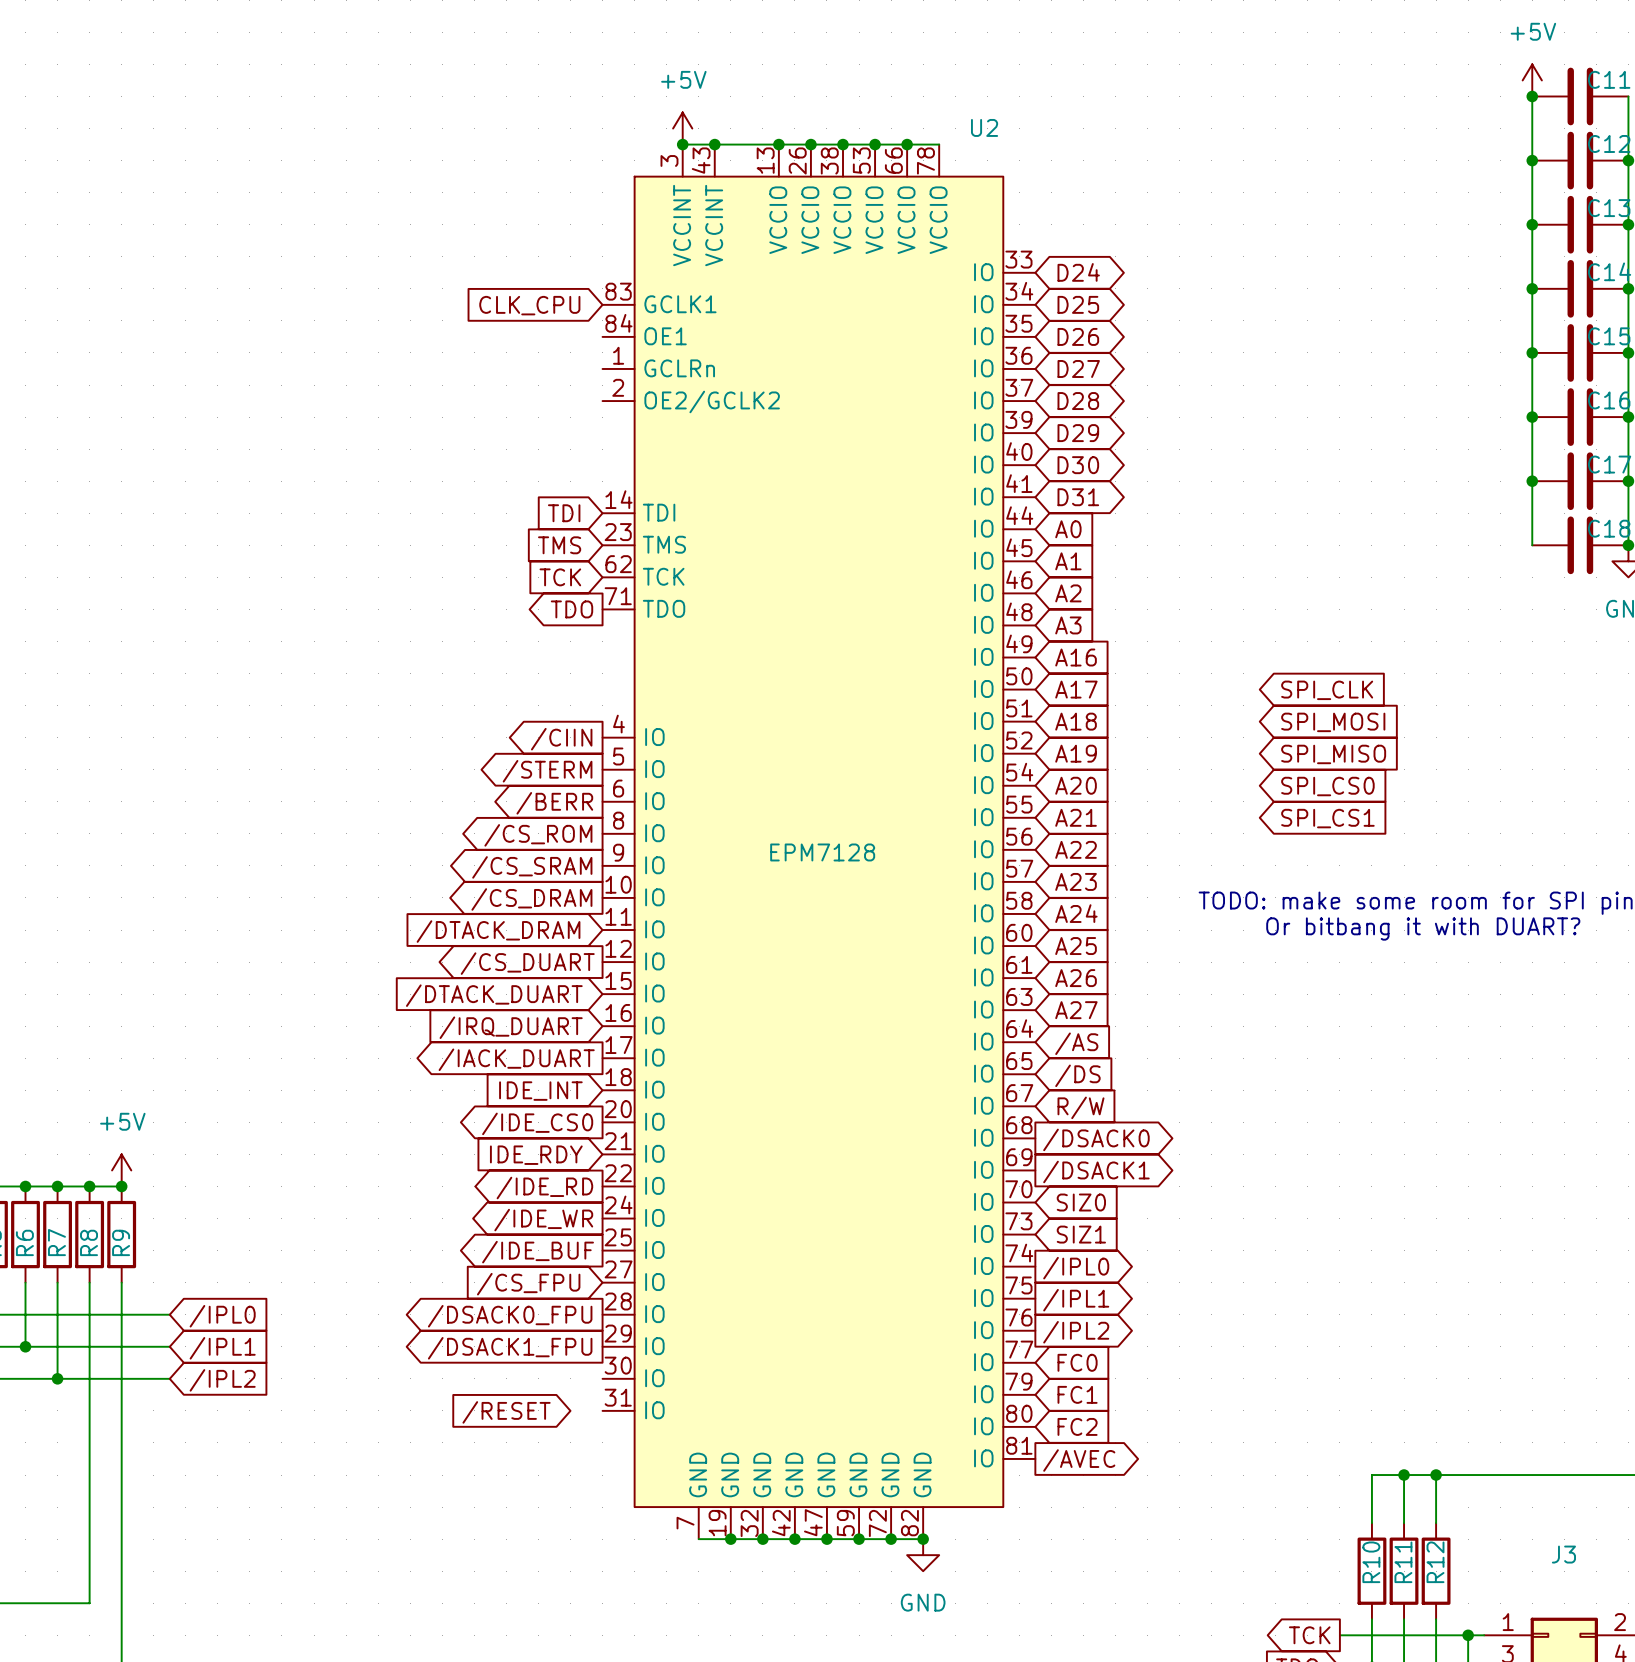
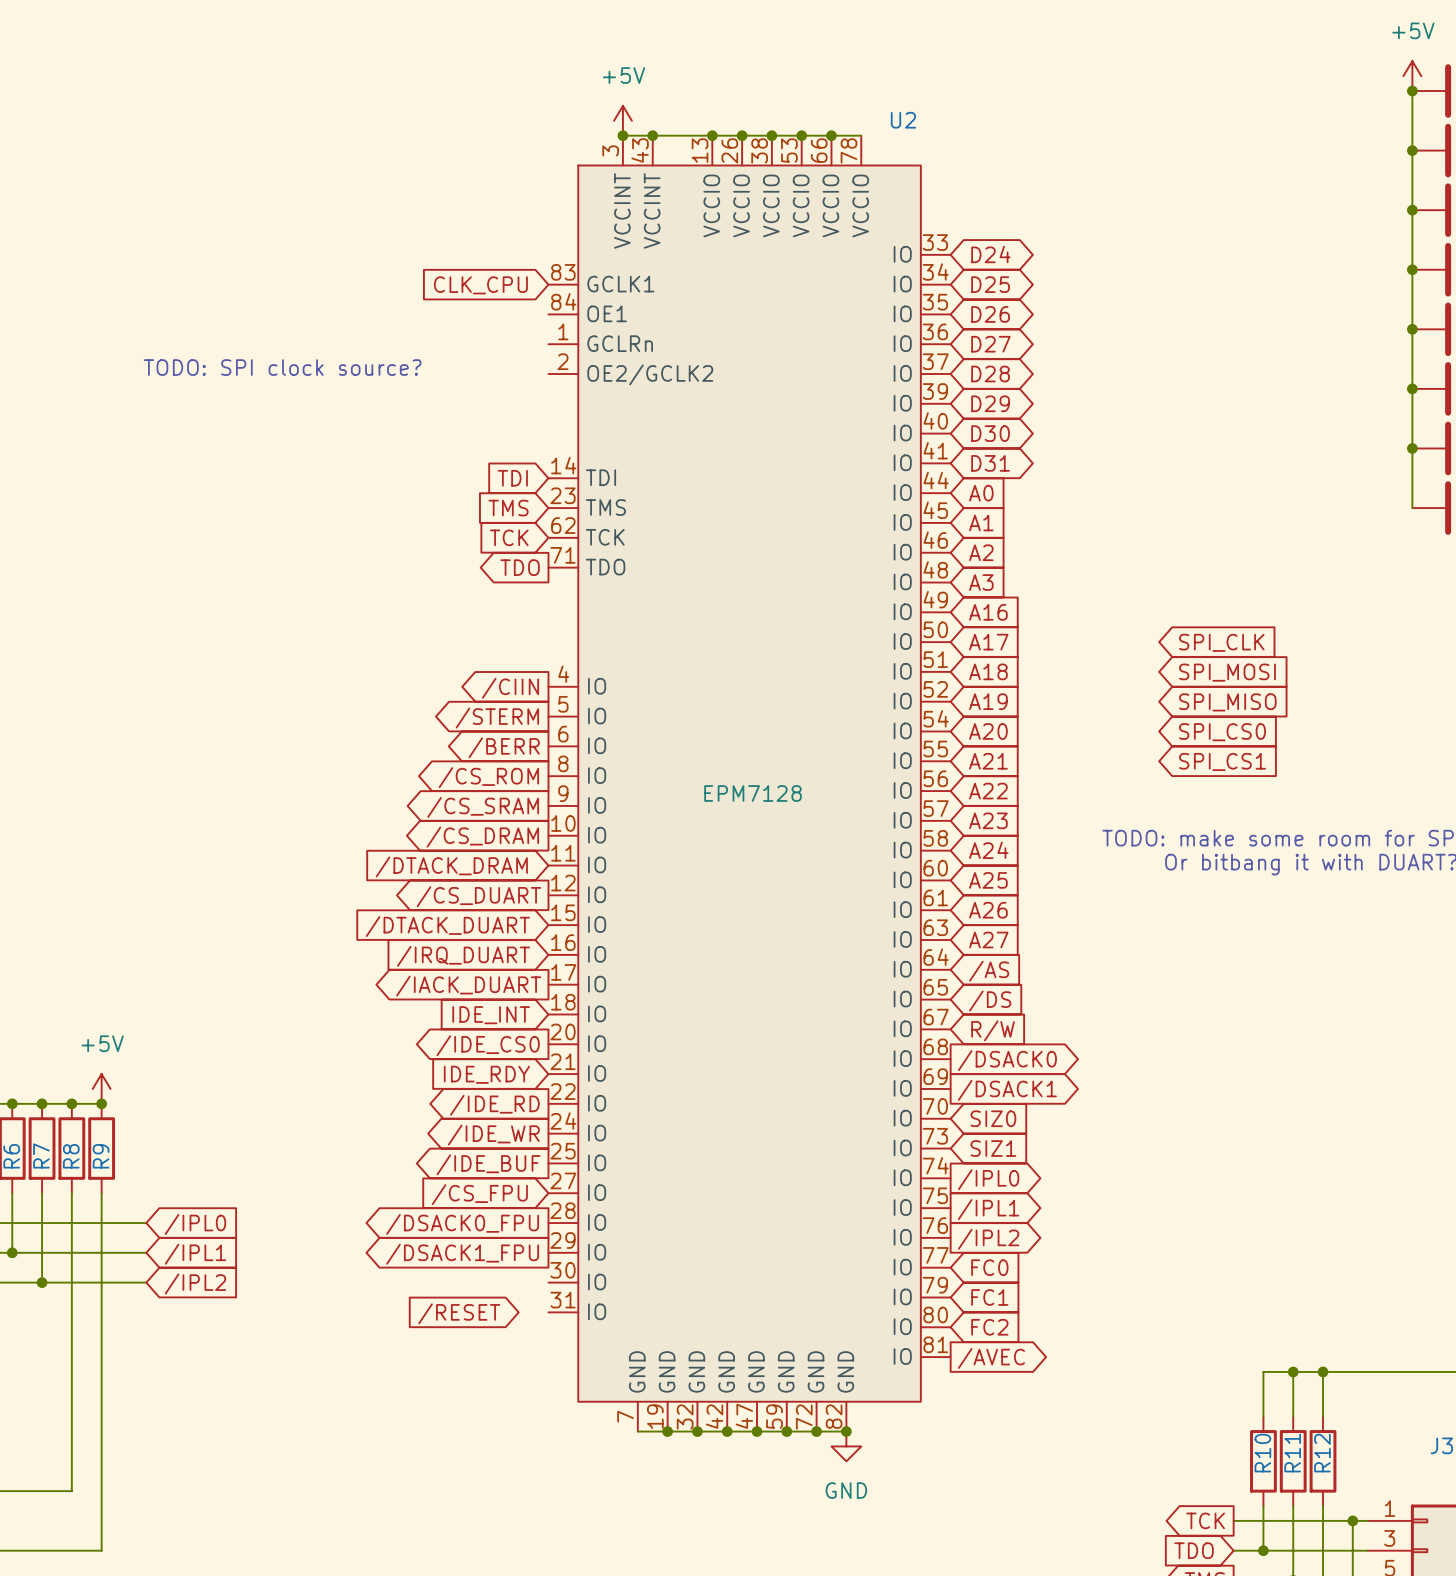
text: none -> TODO: SPI clock source? (282, 367)

